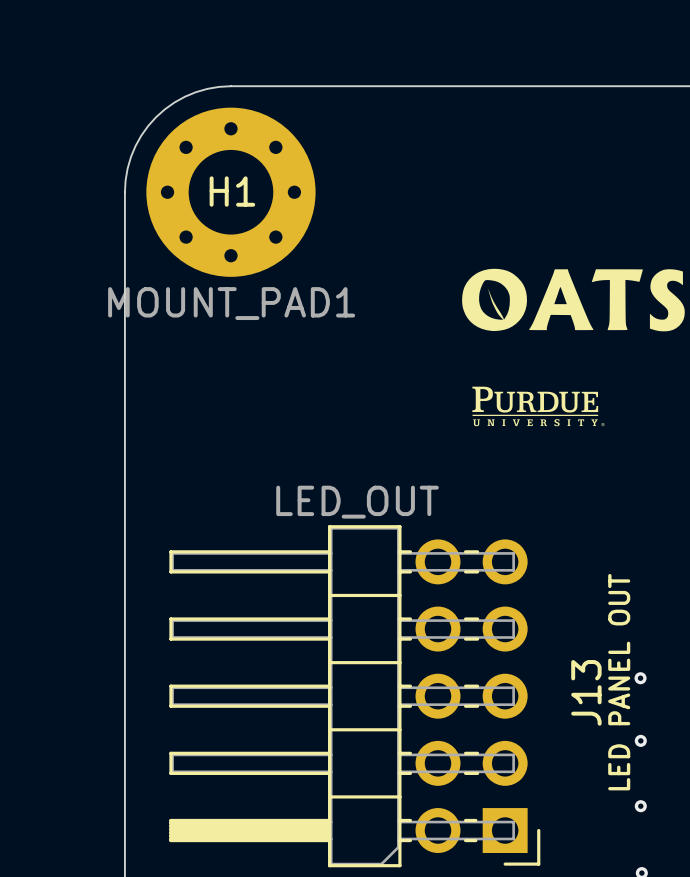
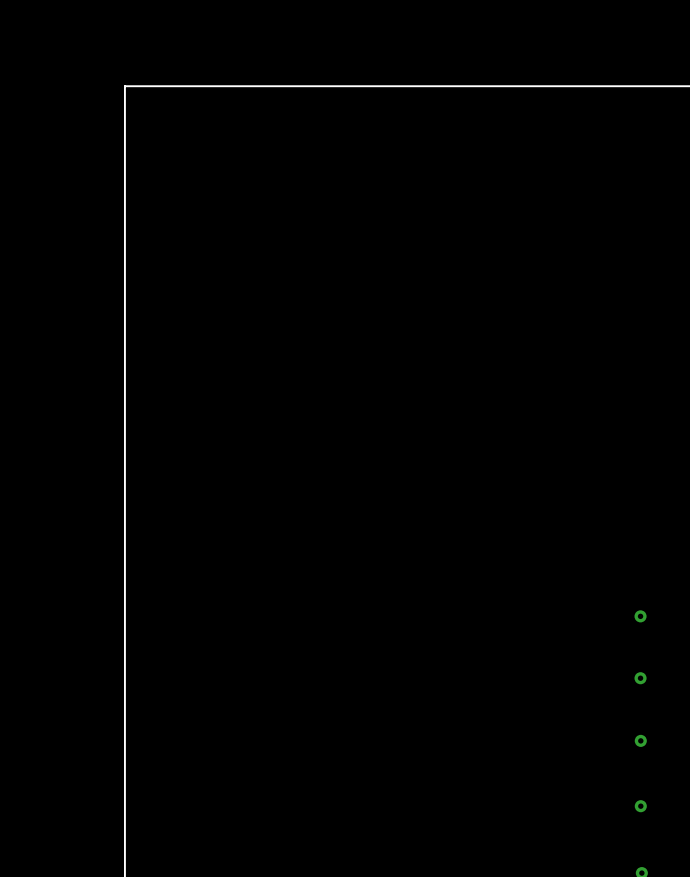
board edge: (230, 86) (195, 92) (174, 102) (156, 117) (141, 135) (130, 157) (124, 192) -> (230, 86) (124, 86) (124, 192)
H1: MOUNT_PAD1 (230, 192) -> none
drawing: [462, 268, 685, 332] -> none
drawing: [472, 386, 605, 427] -> none
via: none -> (640, 616)
text: LED PANEL OUT (619, 682) -> none
J13: LED_OUT (354, 696) -> none

